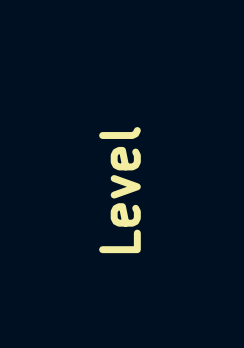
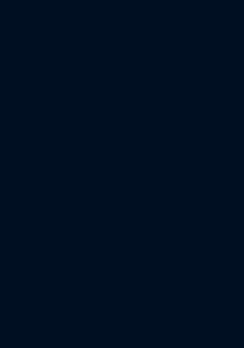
text: Level (119, 190) -> none

